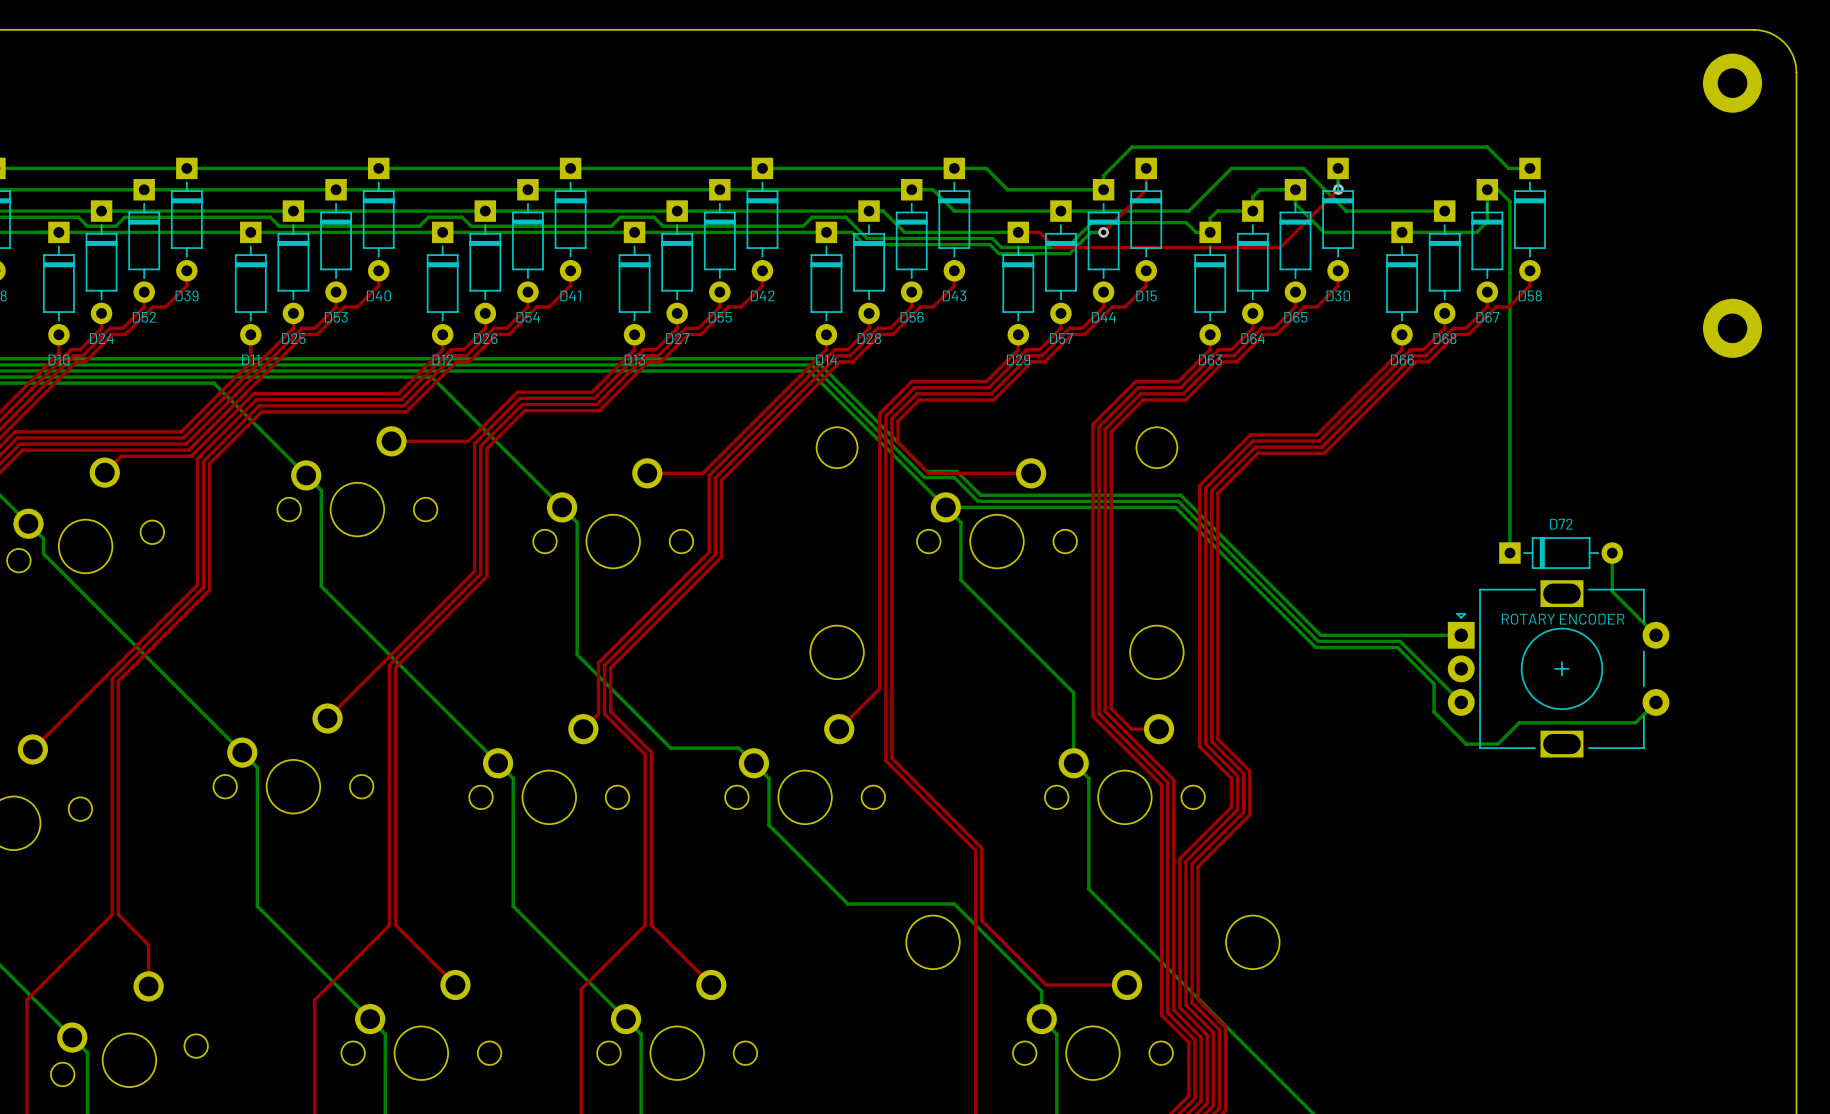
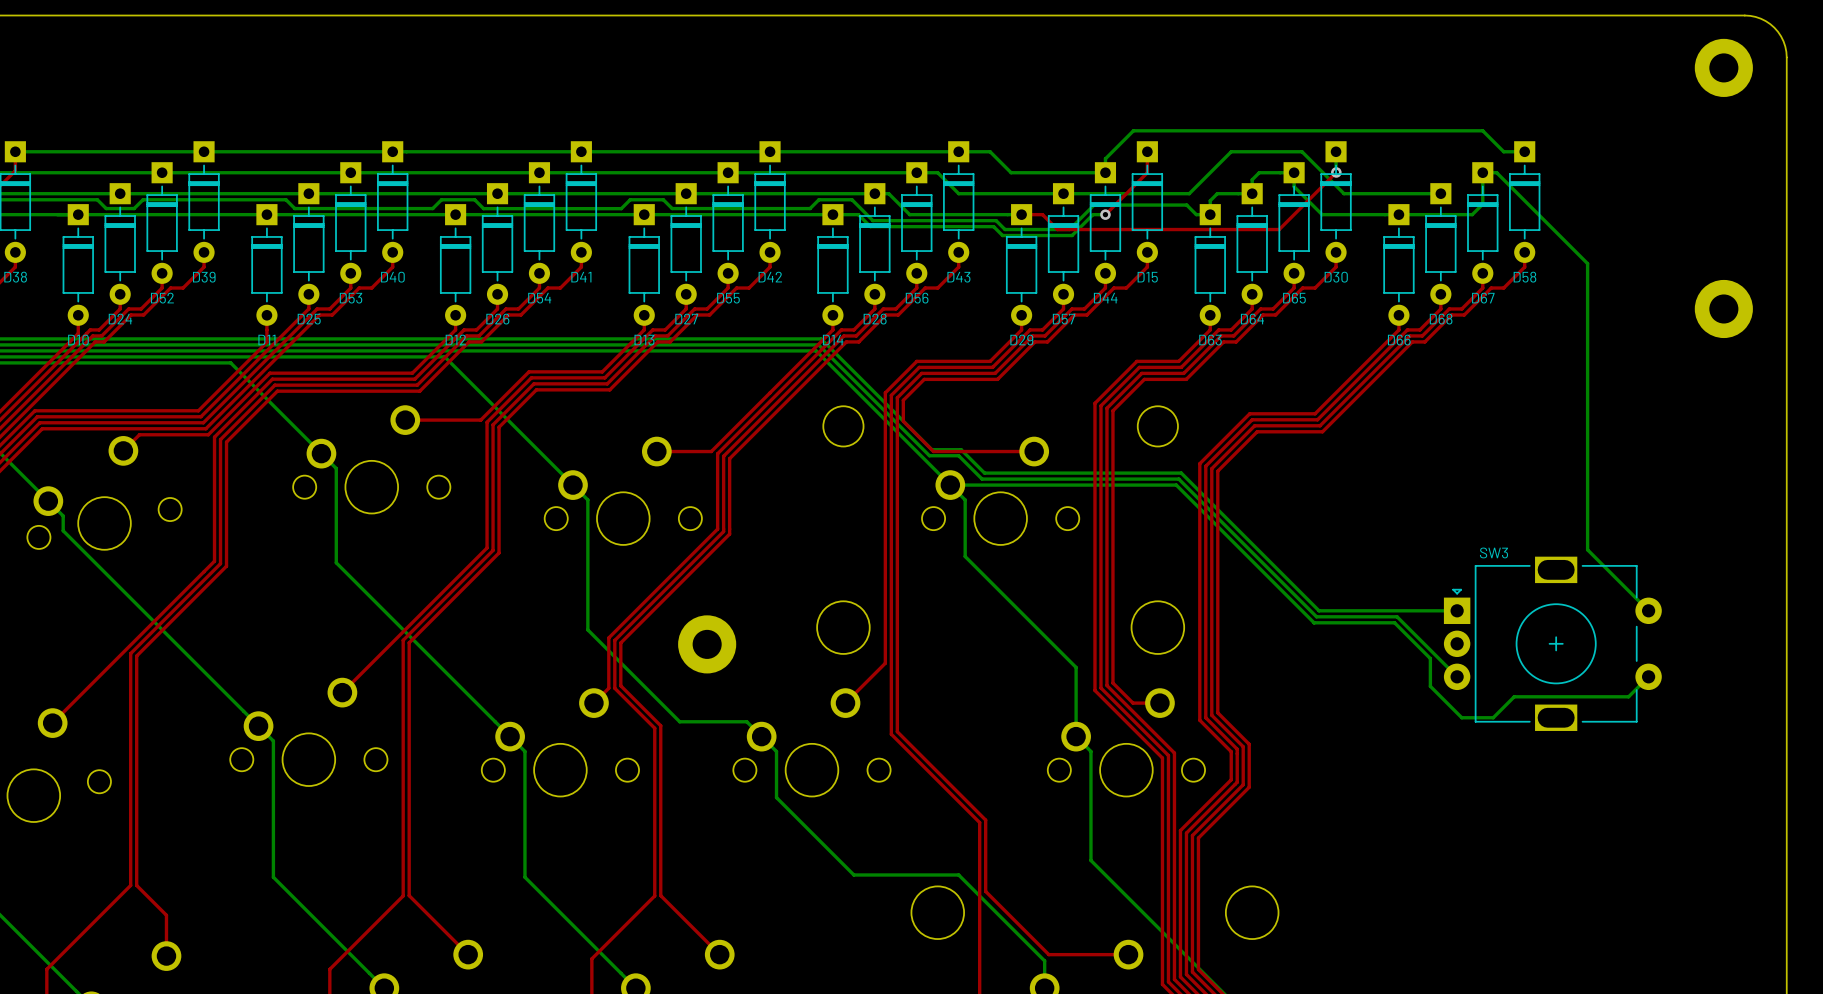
bottom track: (1498, 189) (1509, 201) (1509, 553) -> (1493, 172) (1496, 172) (1587, 263) (1587, 549) (1605, 567)
D72: (1561, 553) -> none
bottom track: (1612, 553) (1612, 591) -> none
ROTARY ENCODER name: ROTARY ENCODER (1563, 619) -> SW3 (1493, 552)
part: none -> (707, 644)

